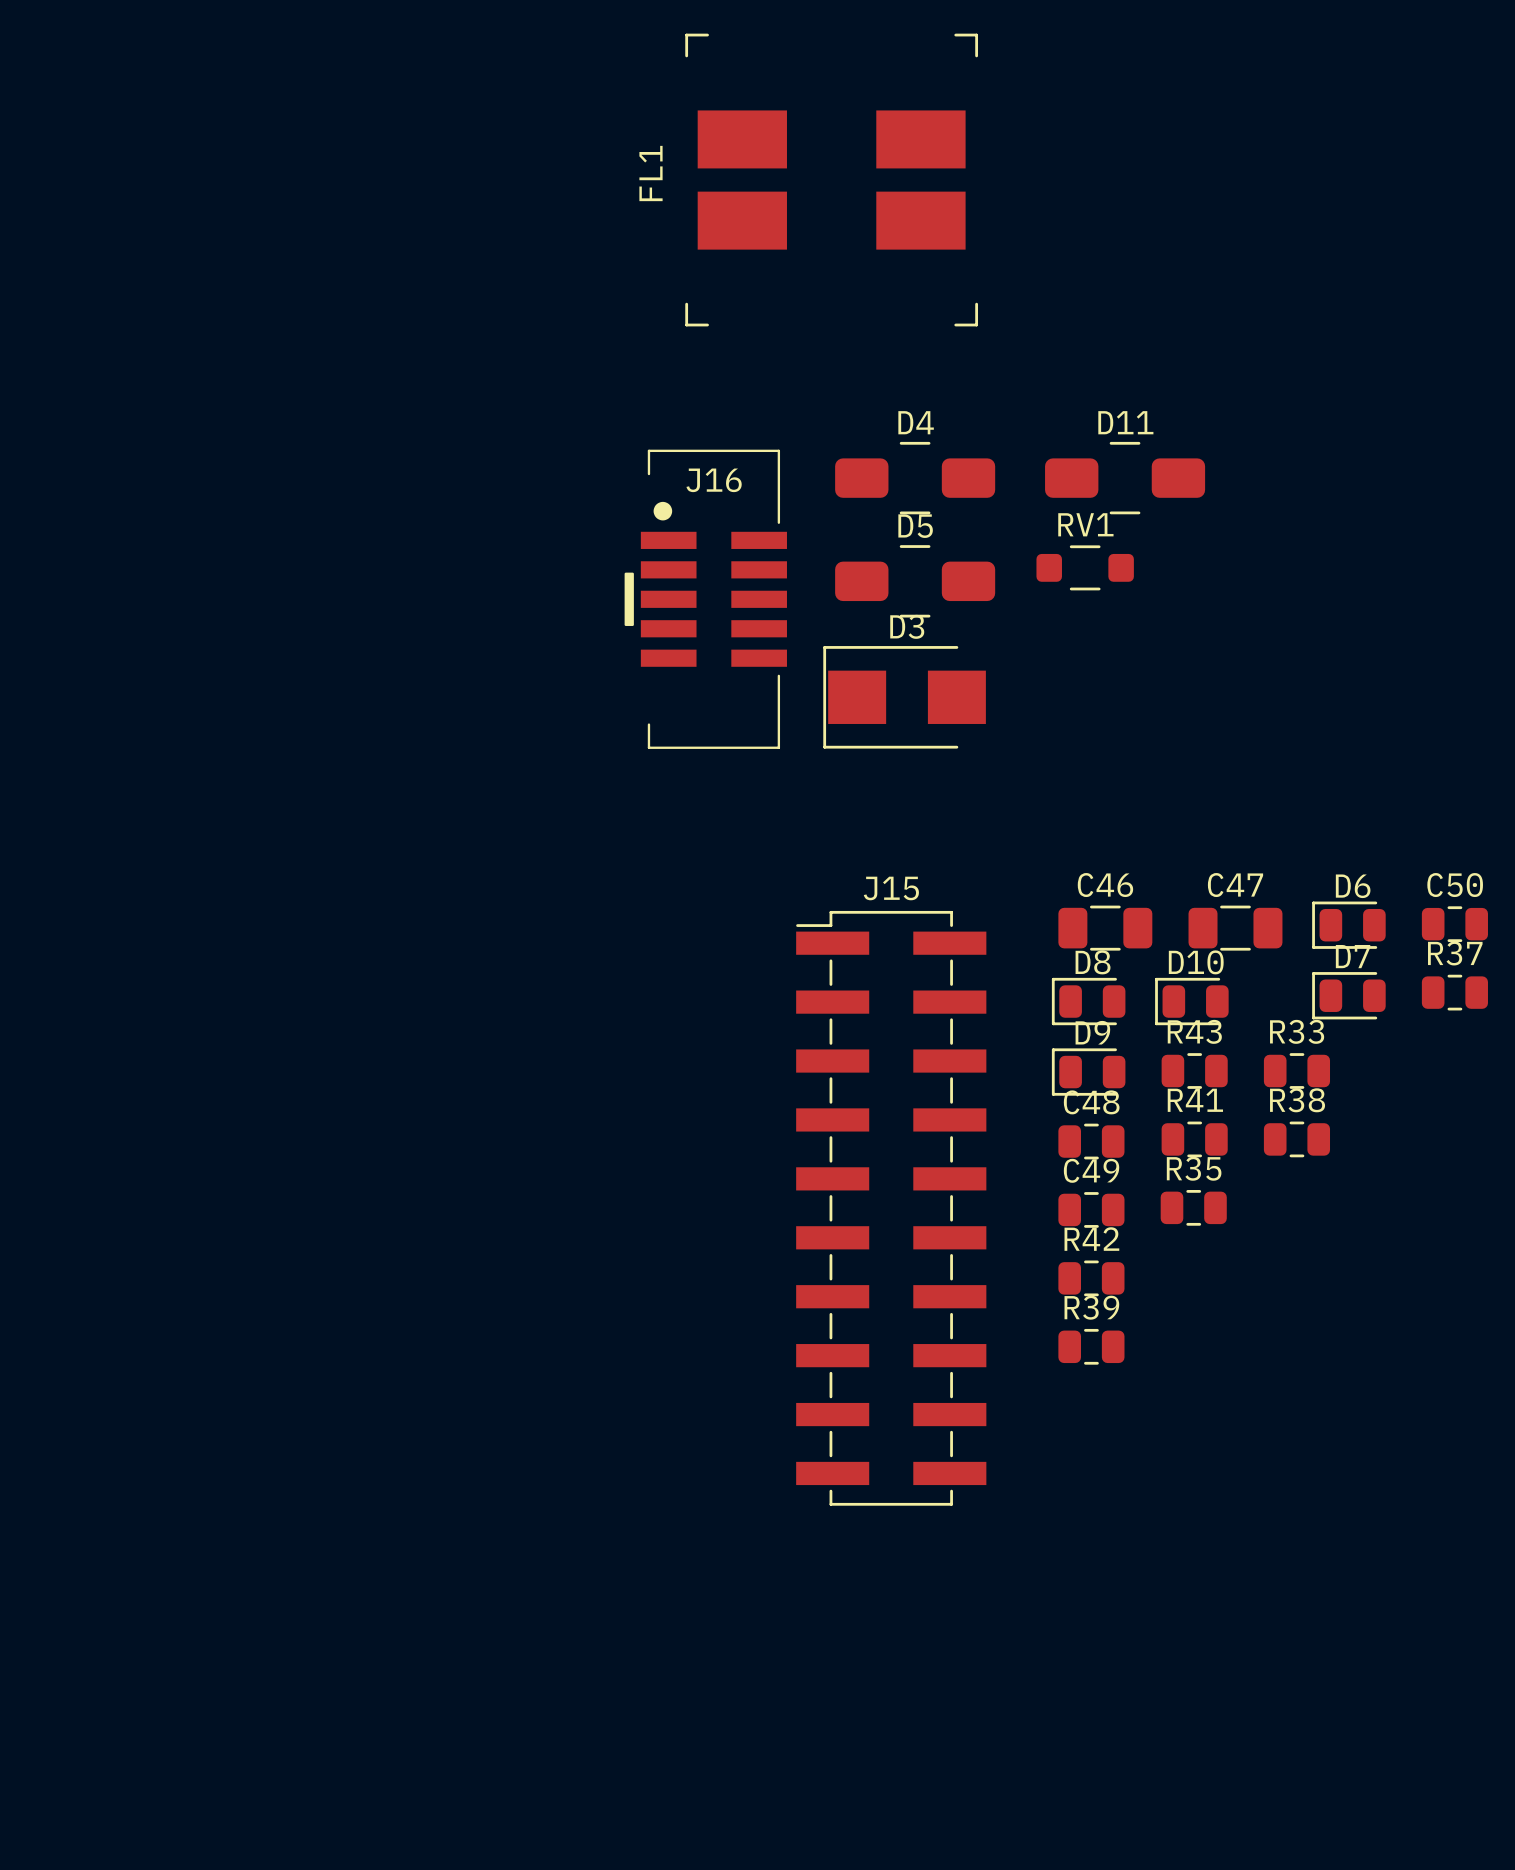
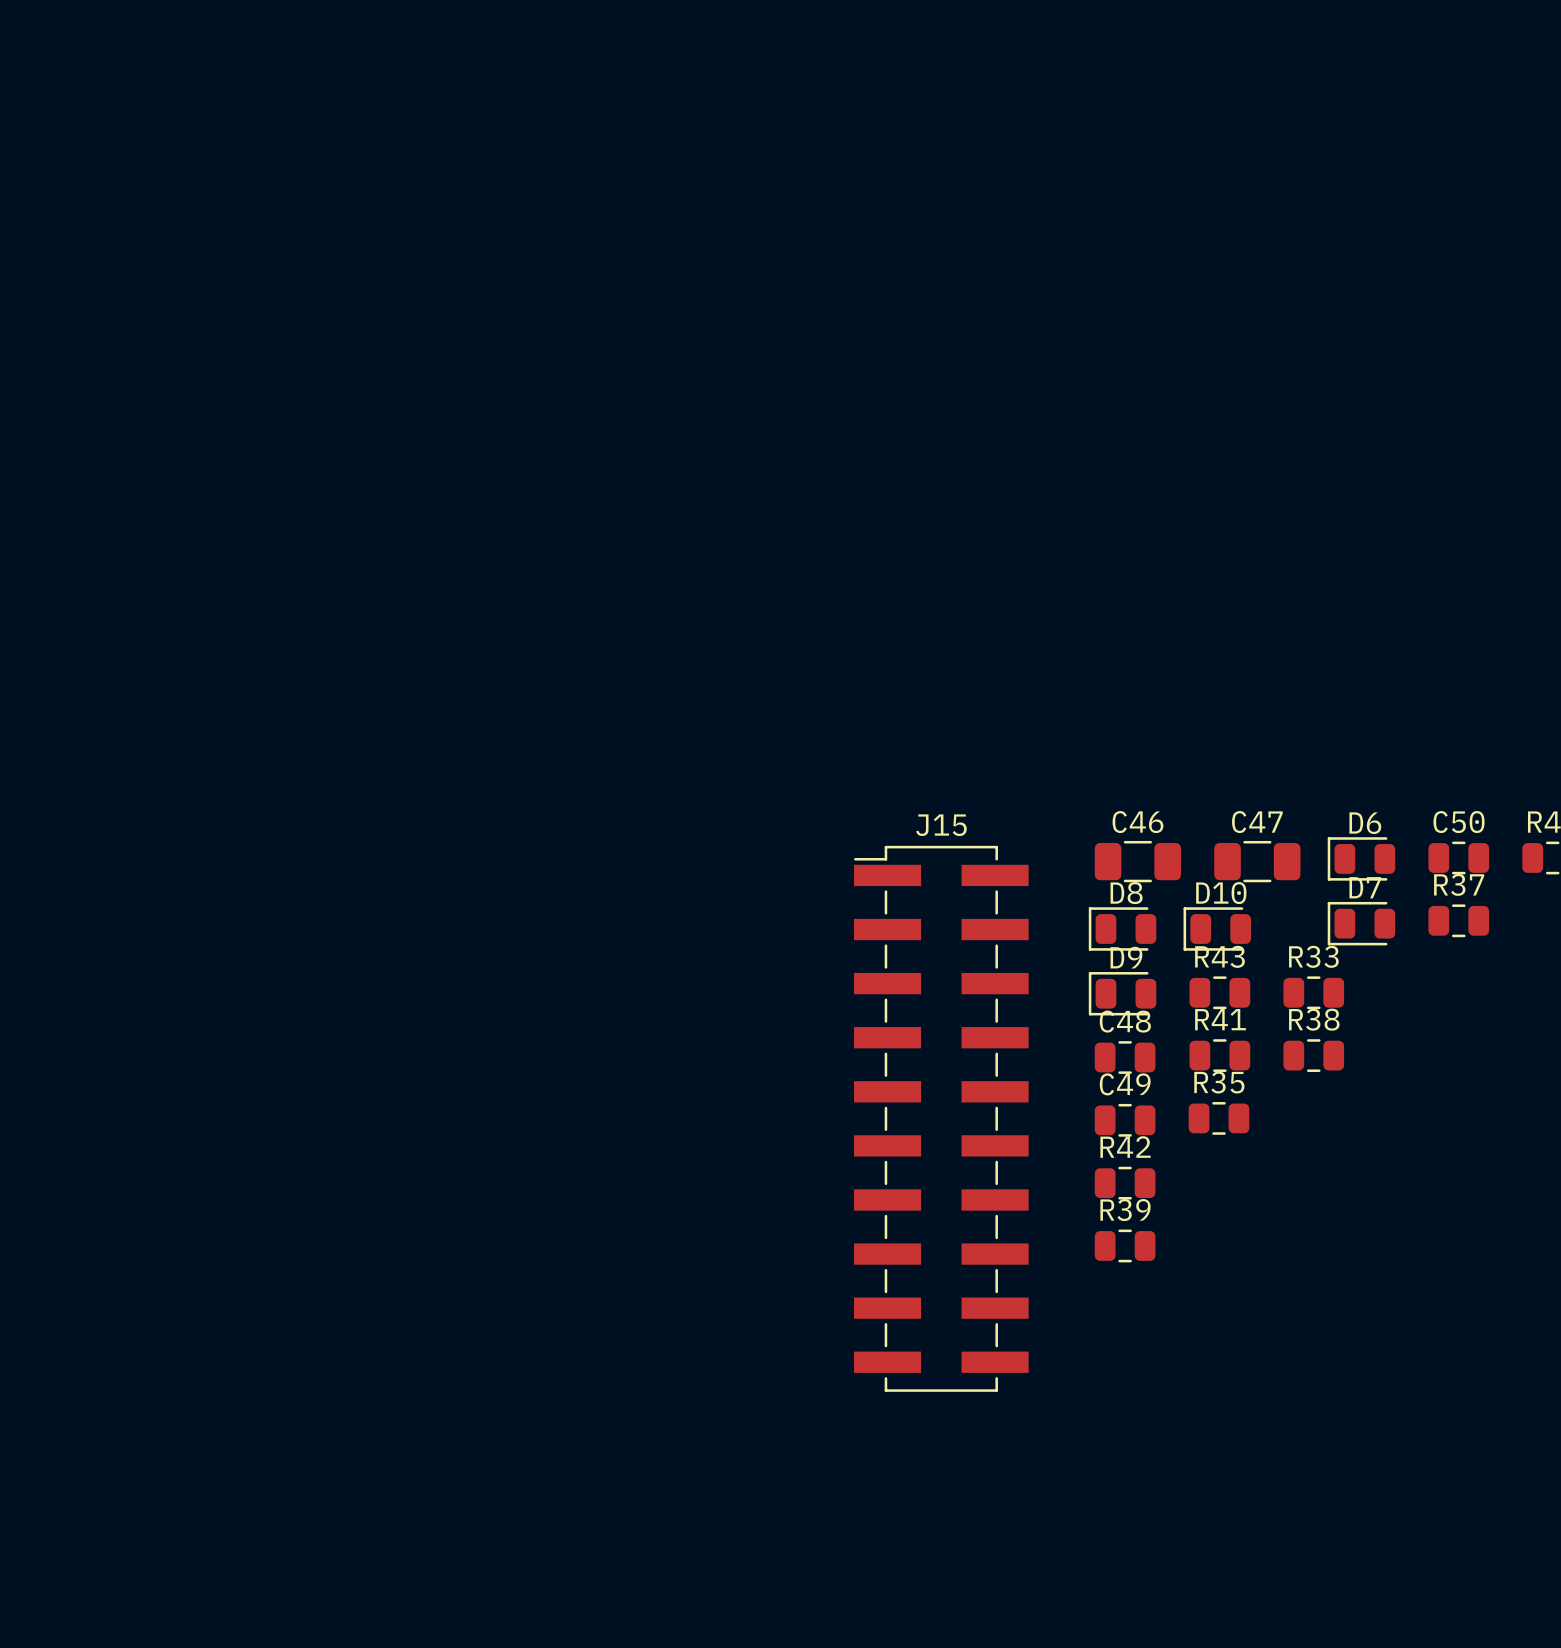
FL1: (831, 180) -> none
D4: (915, 478) -> none
D11: (1125, 478) -> none
RV1: (1085, 567) -> none
D5: (915, 581) -> none
J16: (705, 599) -> none
D3: (904, 697) -> none

